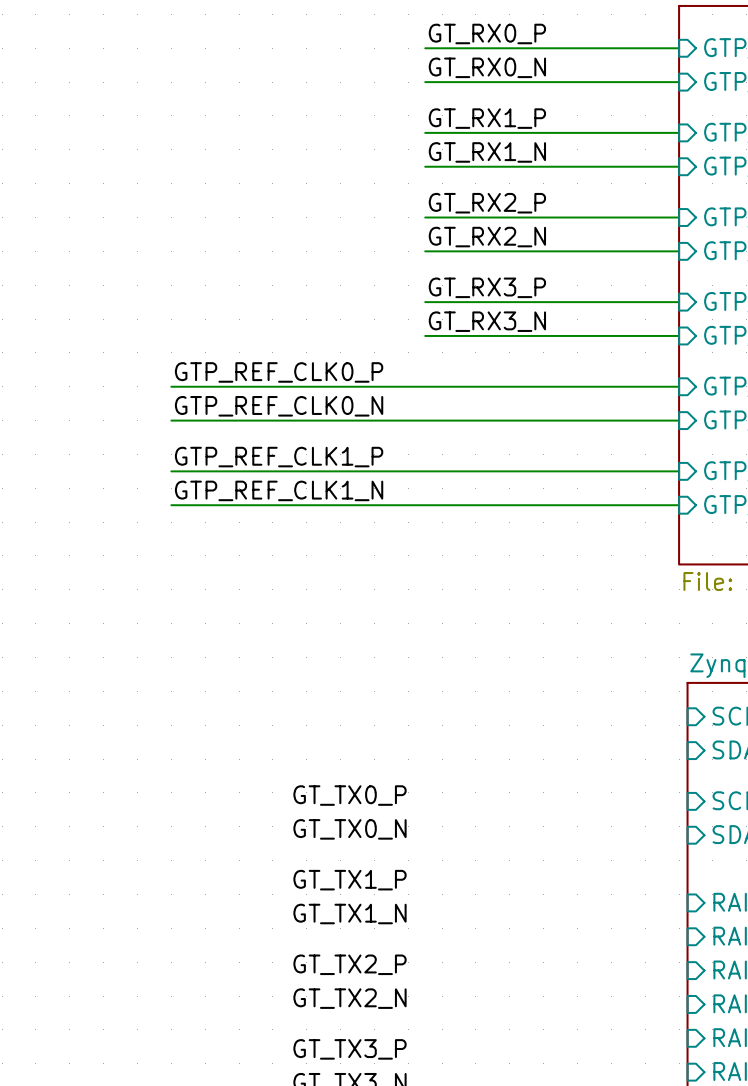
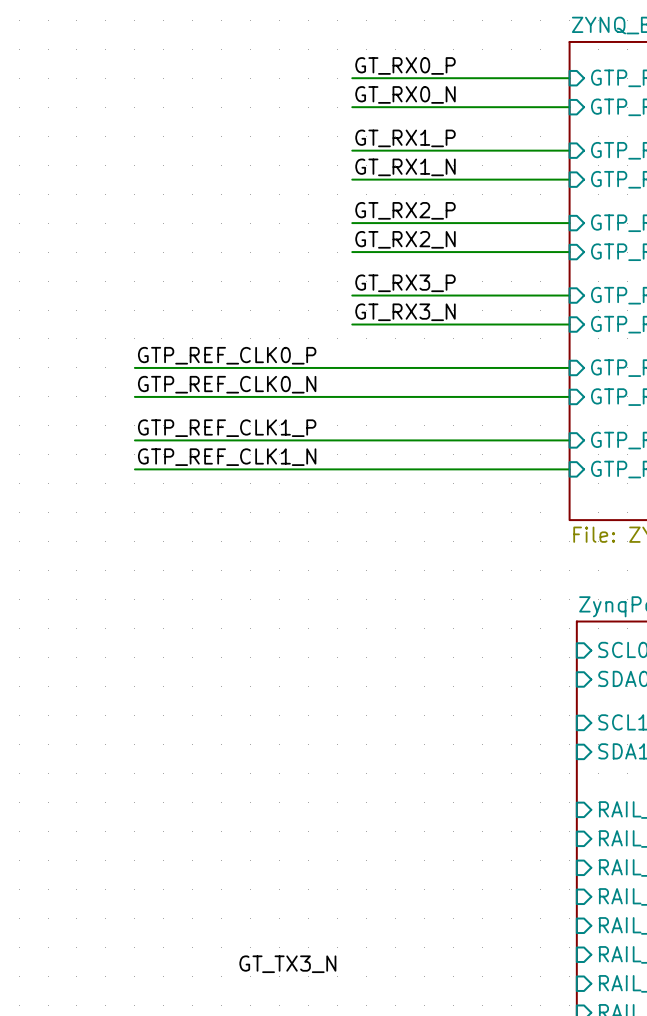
label: GT_TX0_P (349, 795) -> none
label: GT_TX0_N (349, 829) -> none
label: GT_TX1_P (349, 880) -> none
label: GT_TX1_N (349, 914) -> none
label: GT_TX2_P (349, 964) -> none
label: GT_TX2_N (349, 998) -> none
label: GT_TX3_P (349, 1049) -> none

